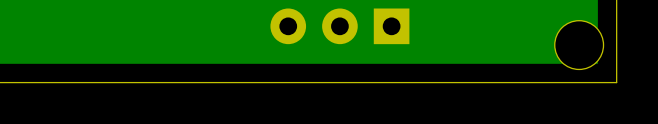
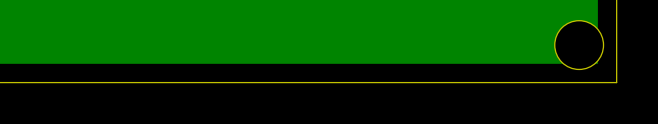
part: (339, 26) -> none

